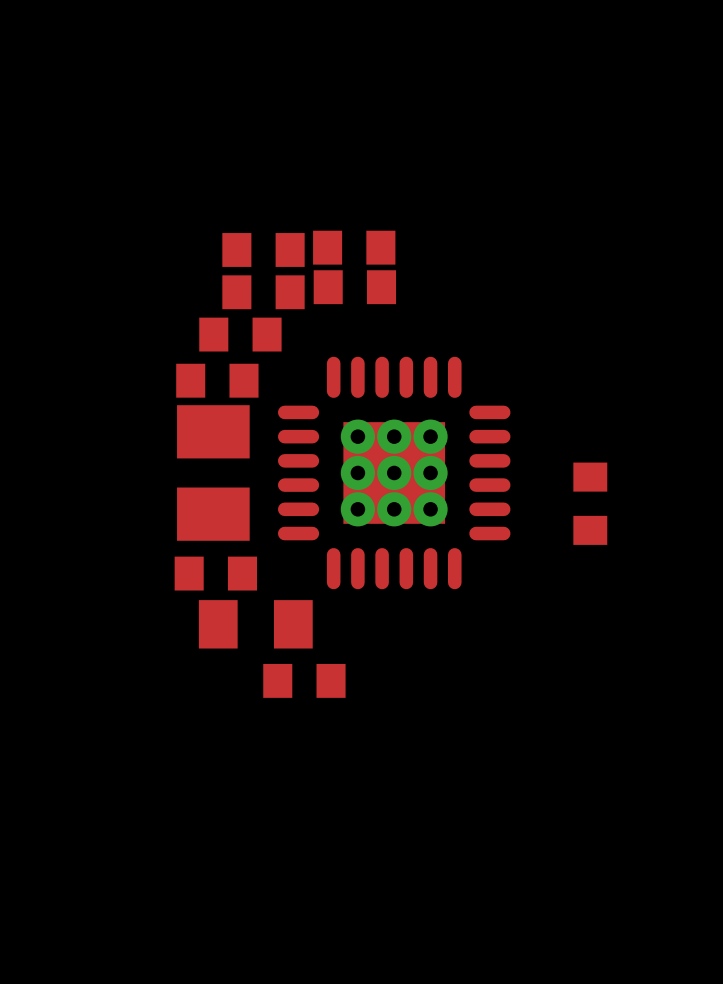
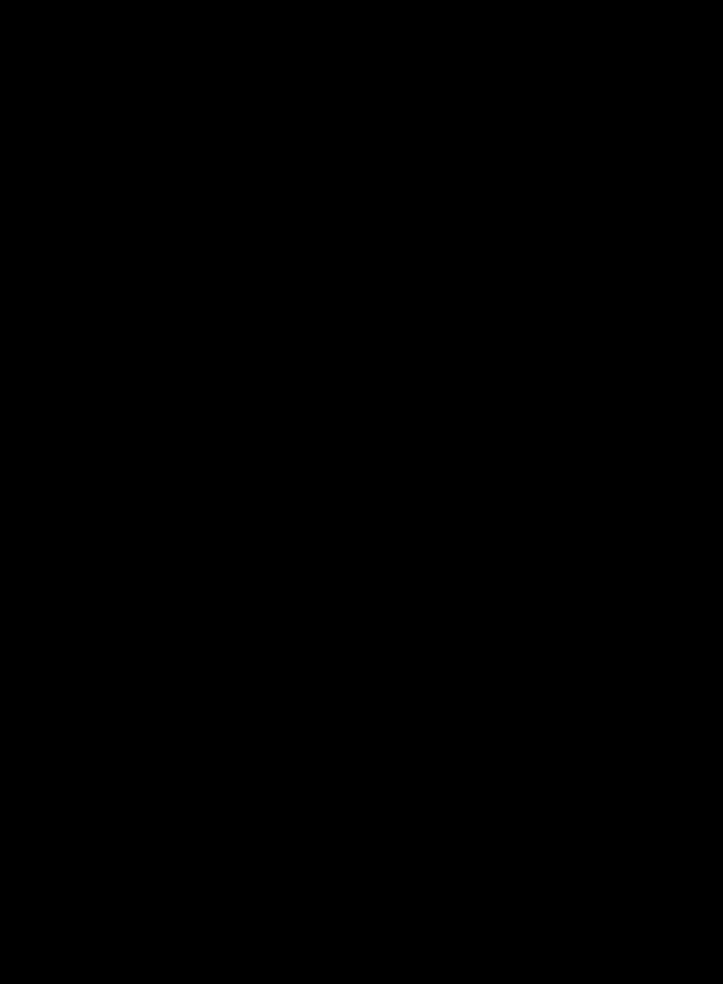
part: (354, 247) -> none
part: (263, 249) -> none
part: (354, 287) -> none
part: (263, 292) -> none
part: (240, 334) -> none
part: (217, 380) -> none
part: (213, 472) -> none
part: (394, 472) -> none
part: (590, 503) -> none
part: (215, 573) -> none
part: (255, 624) -> none
part: (304, 680) -> none

